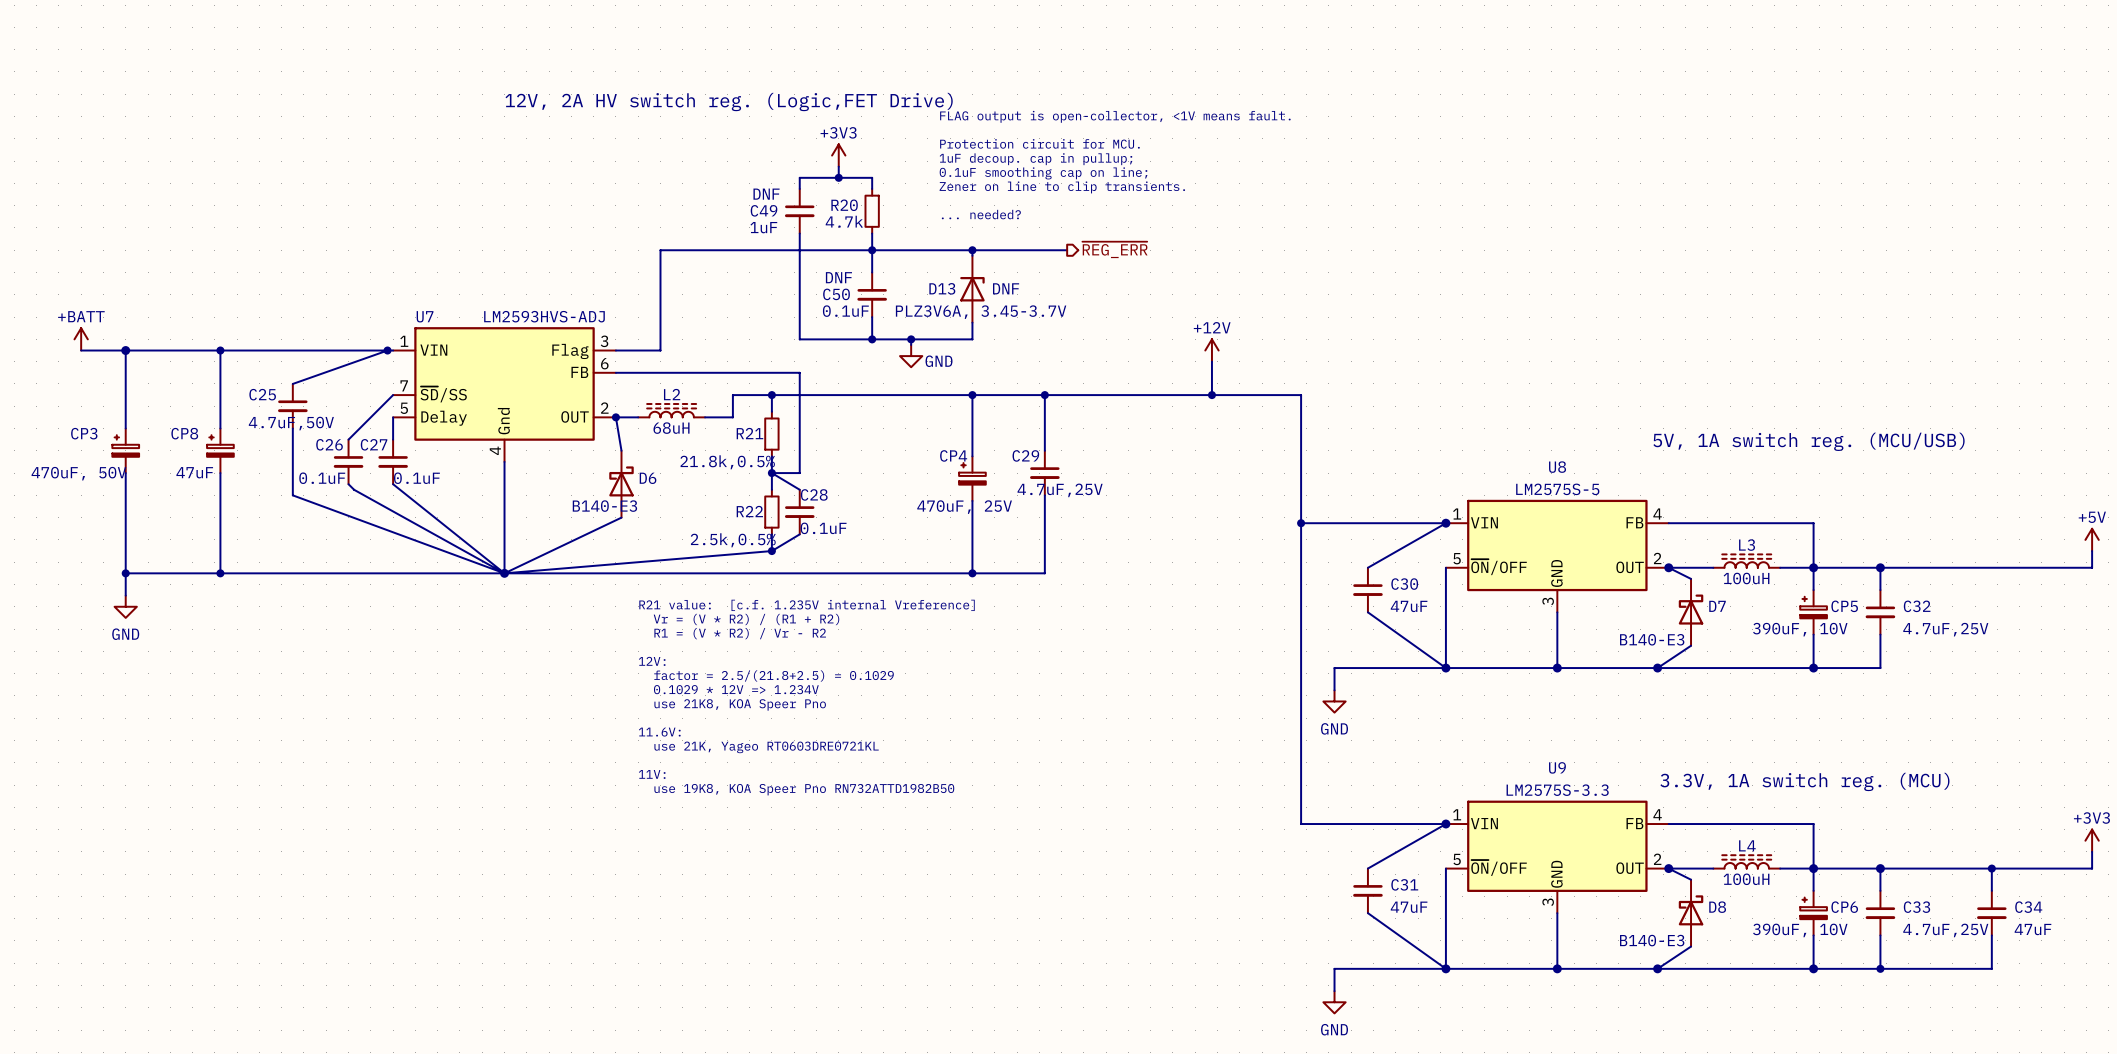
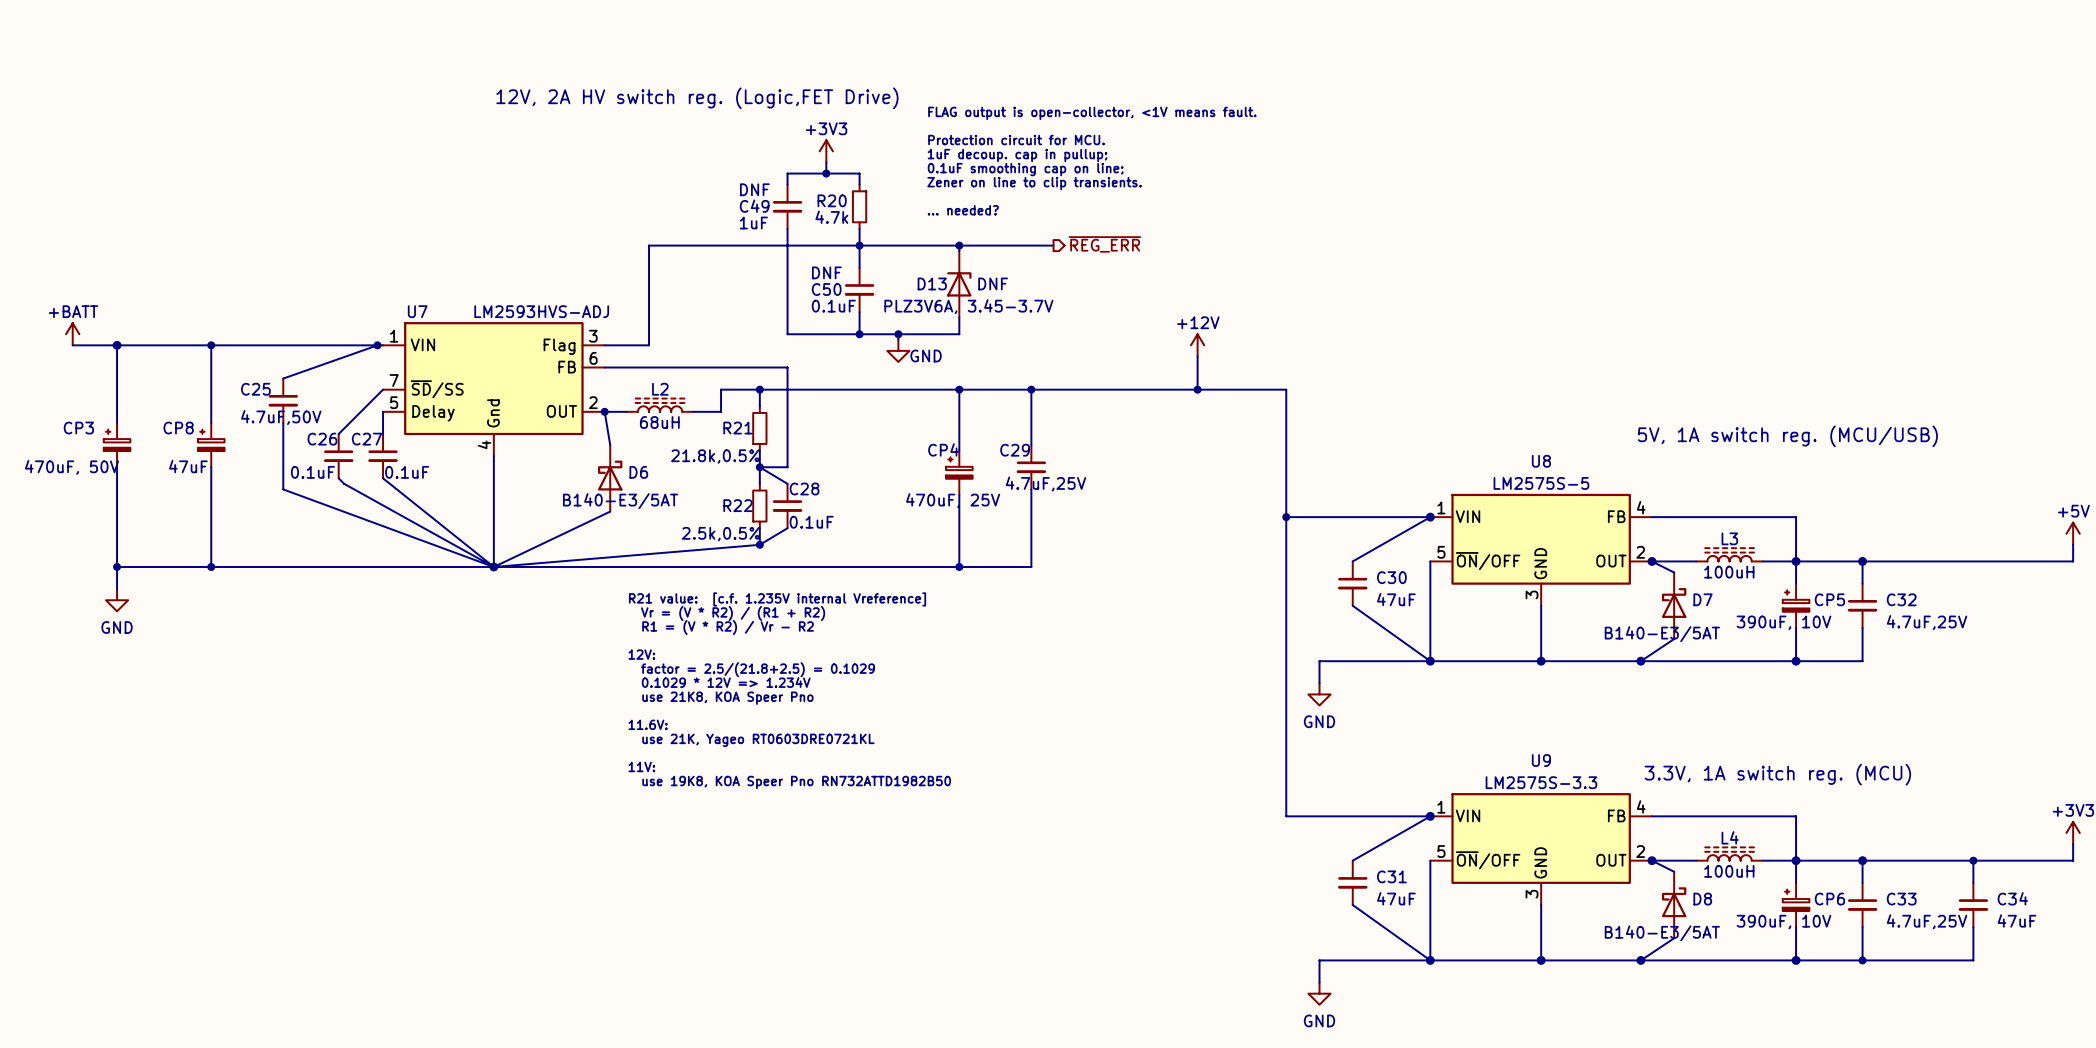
D6 value: B140-E3 (604, 506) -> B140-E3/5AT (620, 501)
D7 value: B140-E3 (1652, 639) -> B140-E3/5AT (1662, 634)
D8 value: B140-E3 (1652, 940) -> B140-E3/5AT (1662, 933)

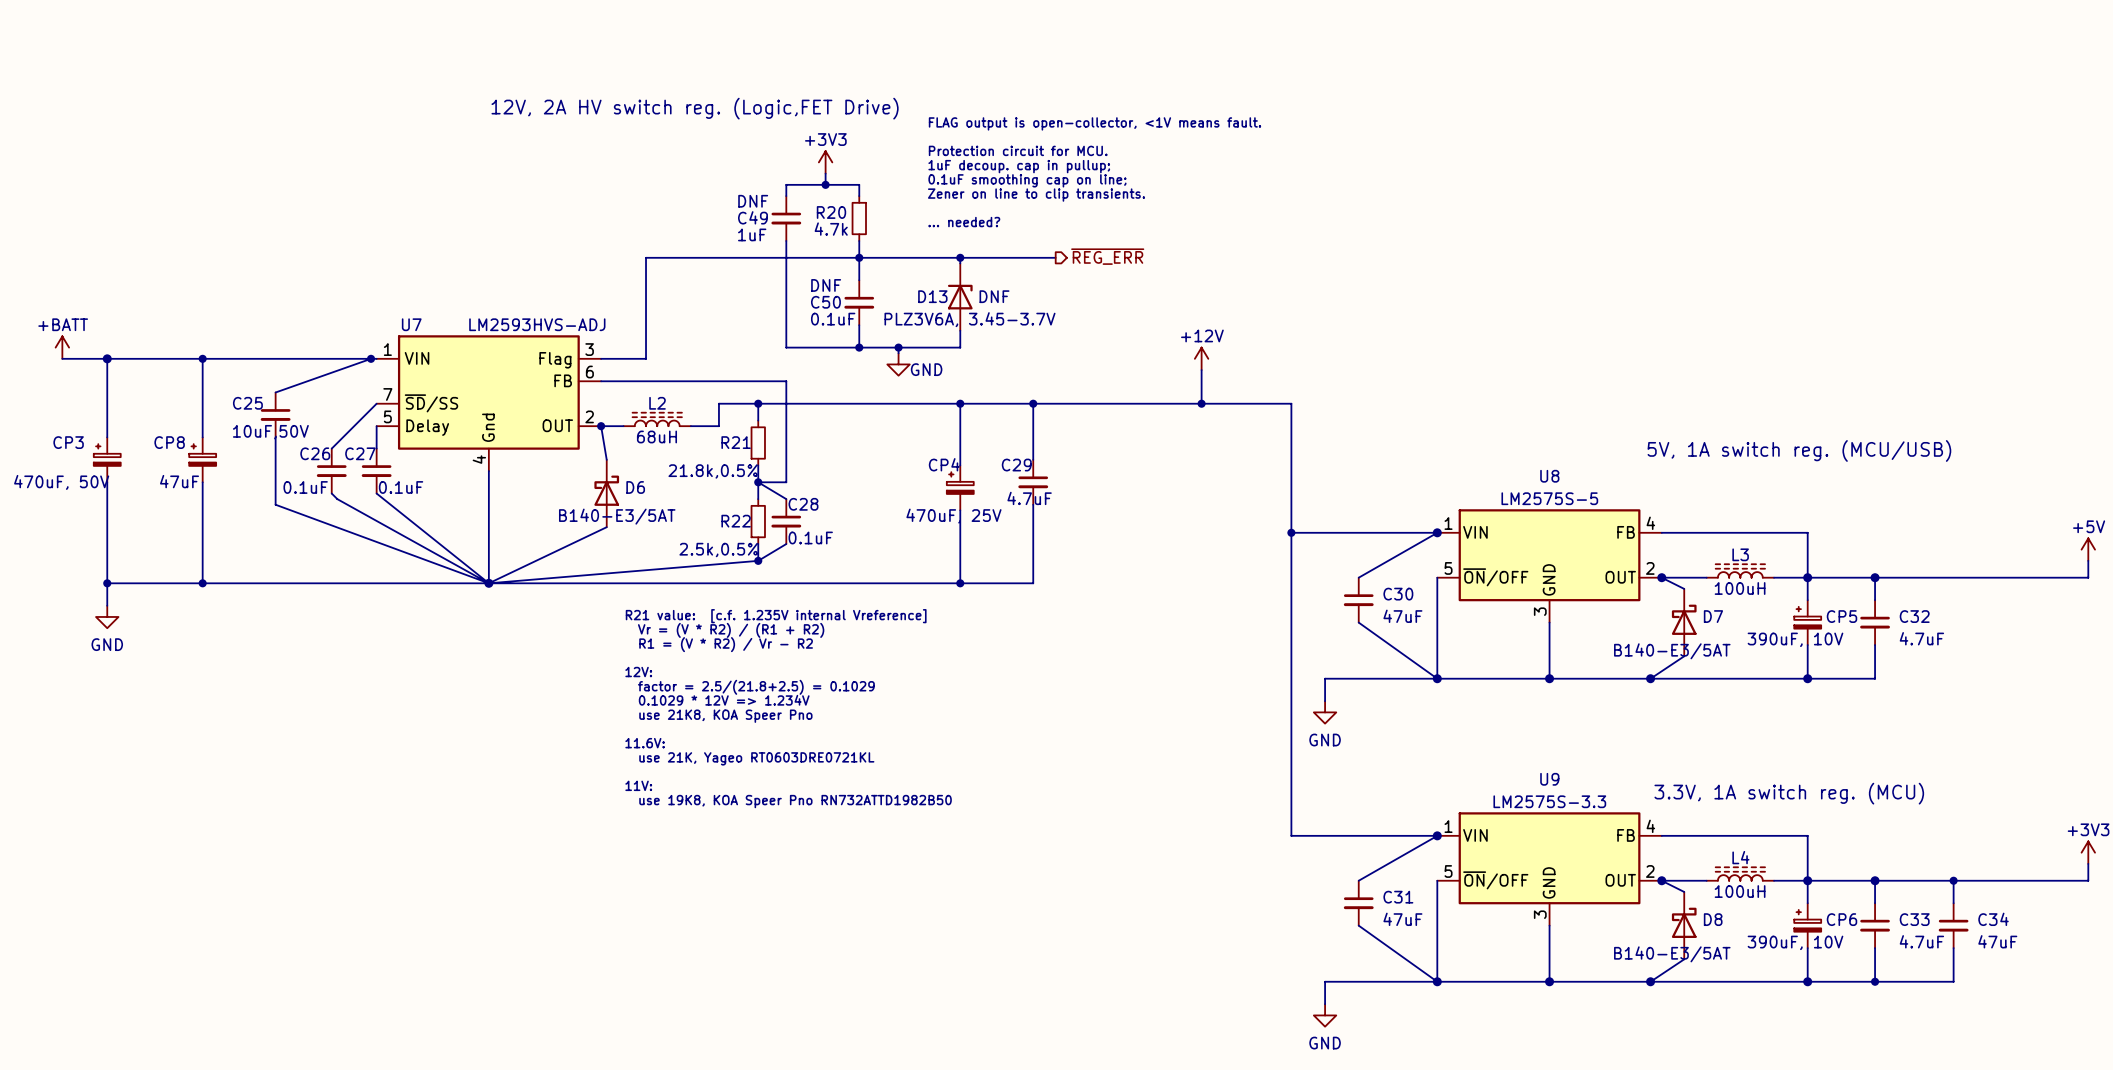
C25 value: 4.7uF,50V (281, 417) -> 10uF,50V (270, 432)
C29 value: 4.7uF,25V (1045, 483) -> 4.7uF (1029, 498)
C32 value: 4.7uF,25V (1927, 622) -> 4.7uF (1921, 638)
wire: (1973, 860) (1973, 882) -> (1953, 880) (1953, 903)
junction position: (1973, 860) -> (1953, 880)
C34 position: (1973, 905) -> (1953, 925)
C33 value: 4.7uF,25V (1927, 921) -> 4.7uF (1921, 941)
wire: (1973, 927) (1973, 960) (1940, 960) -> (1953, 948) (1953, 981)

